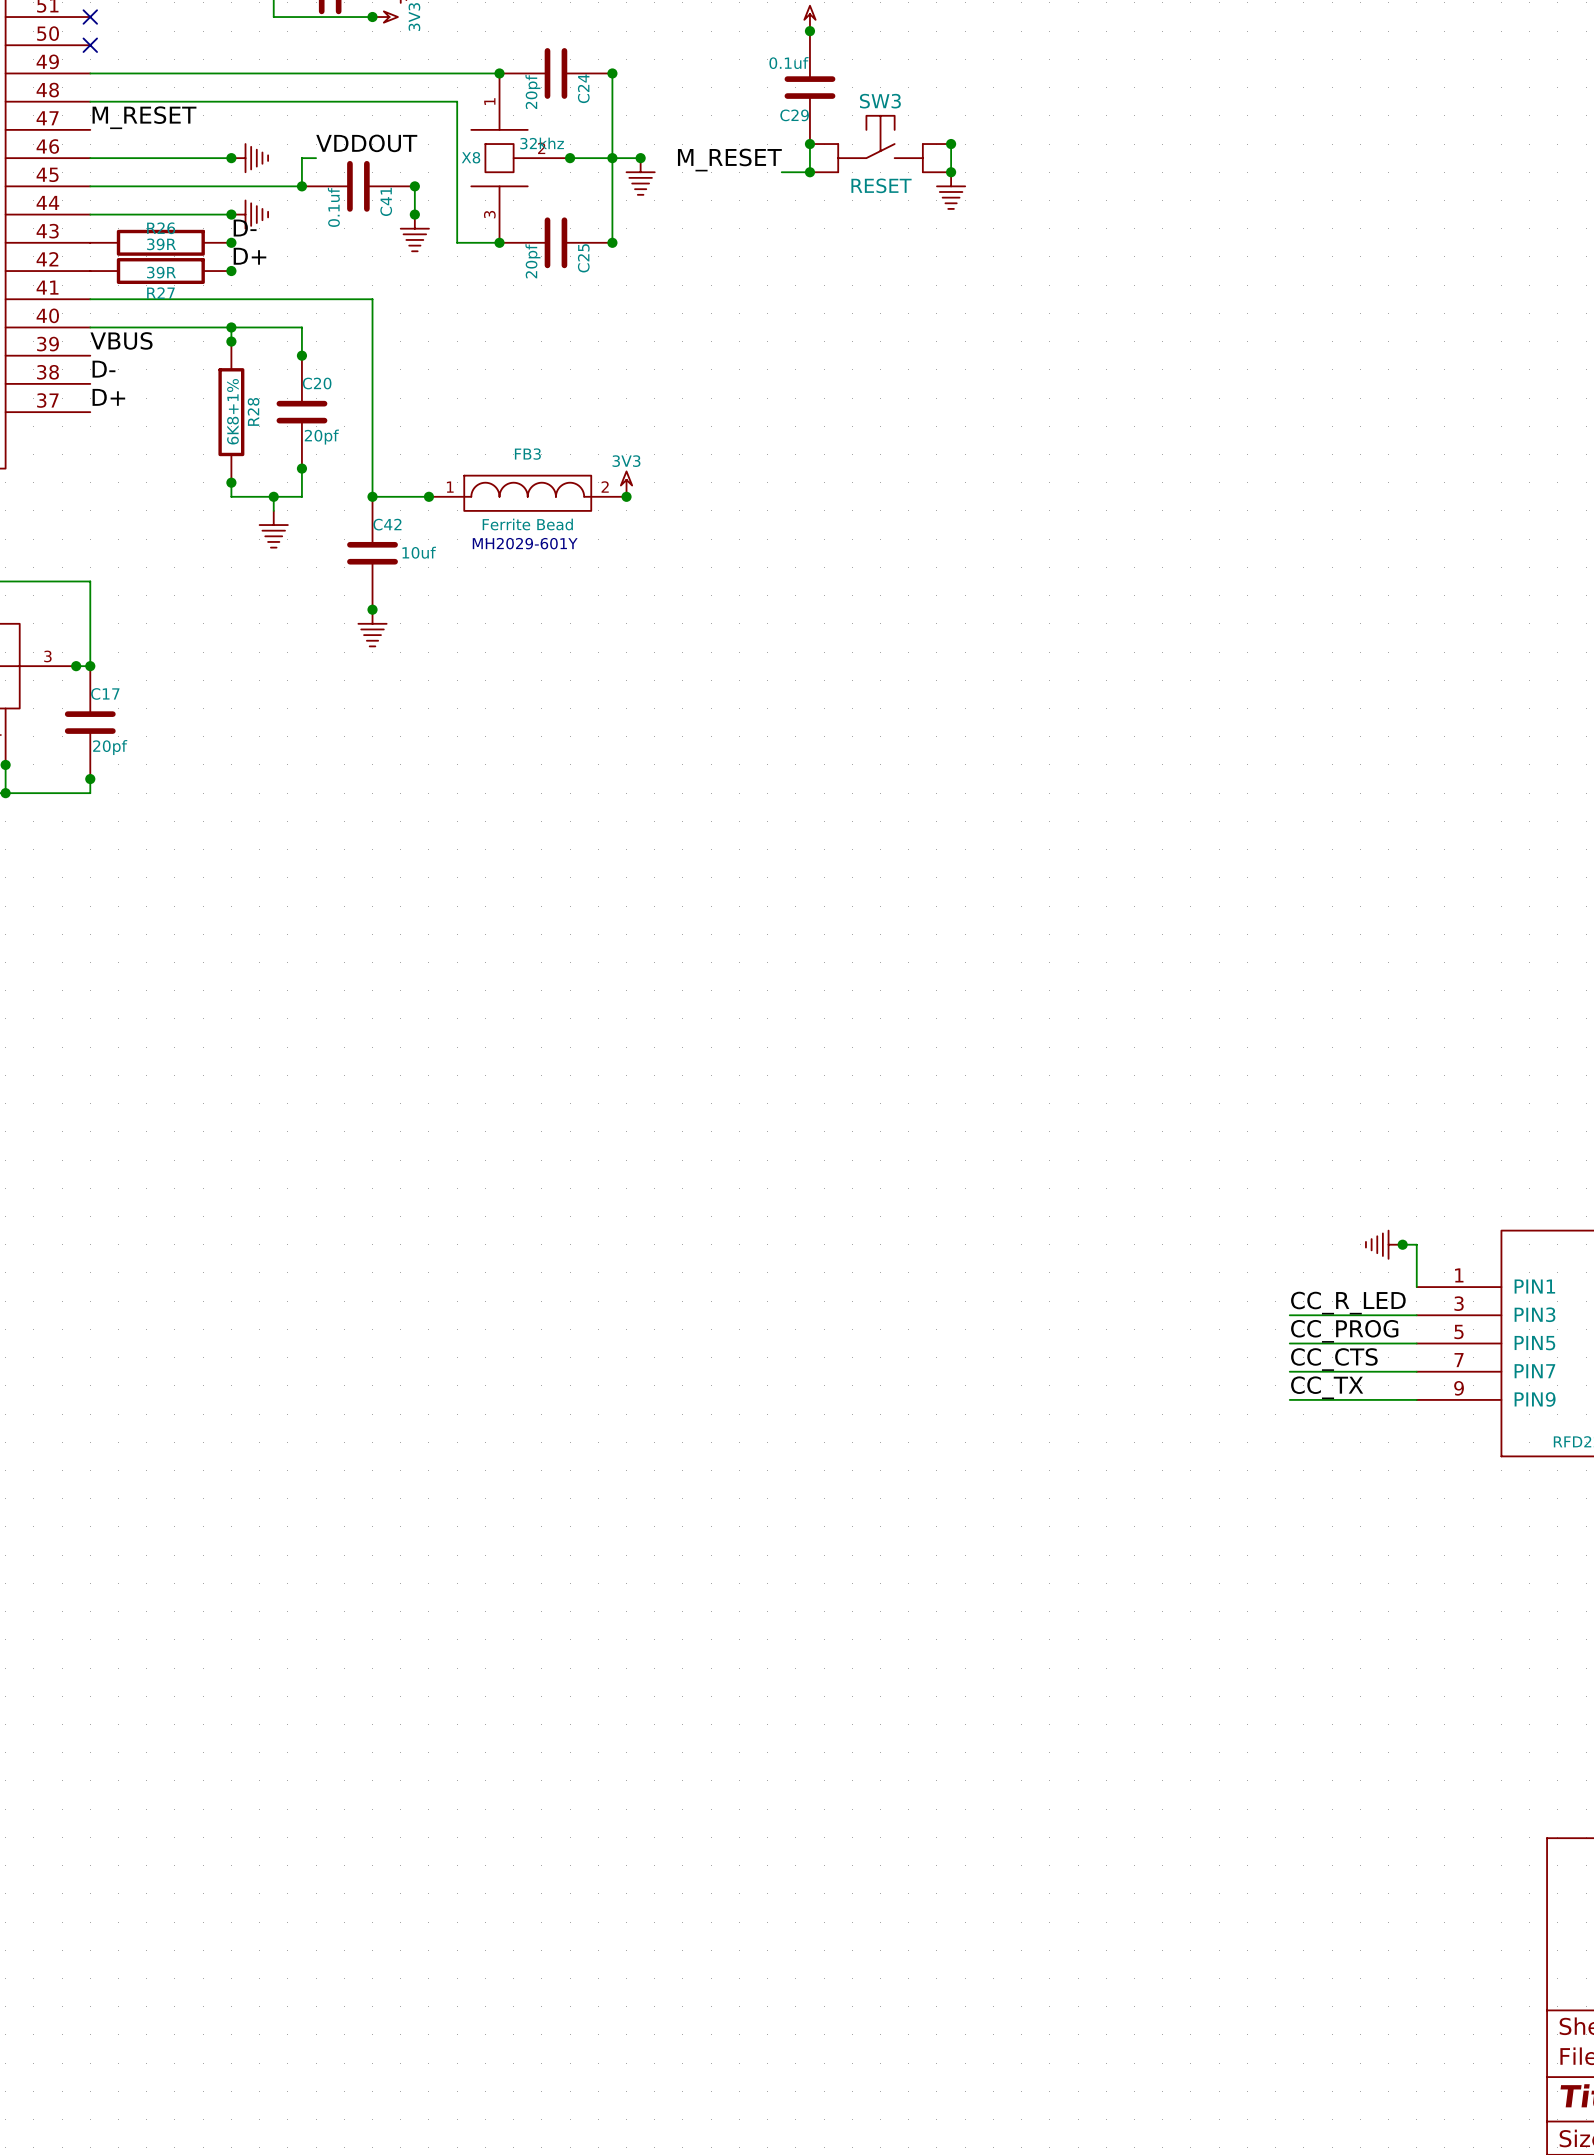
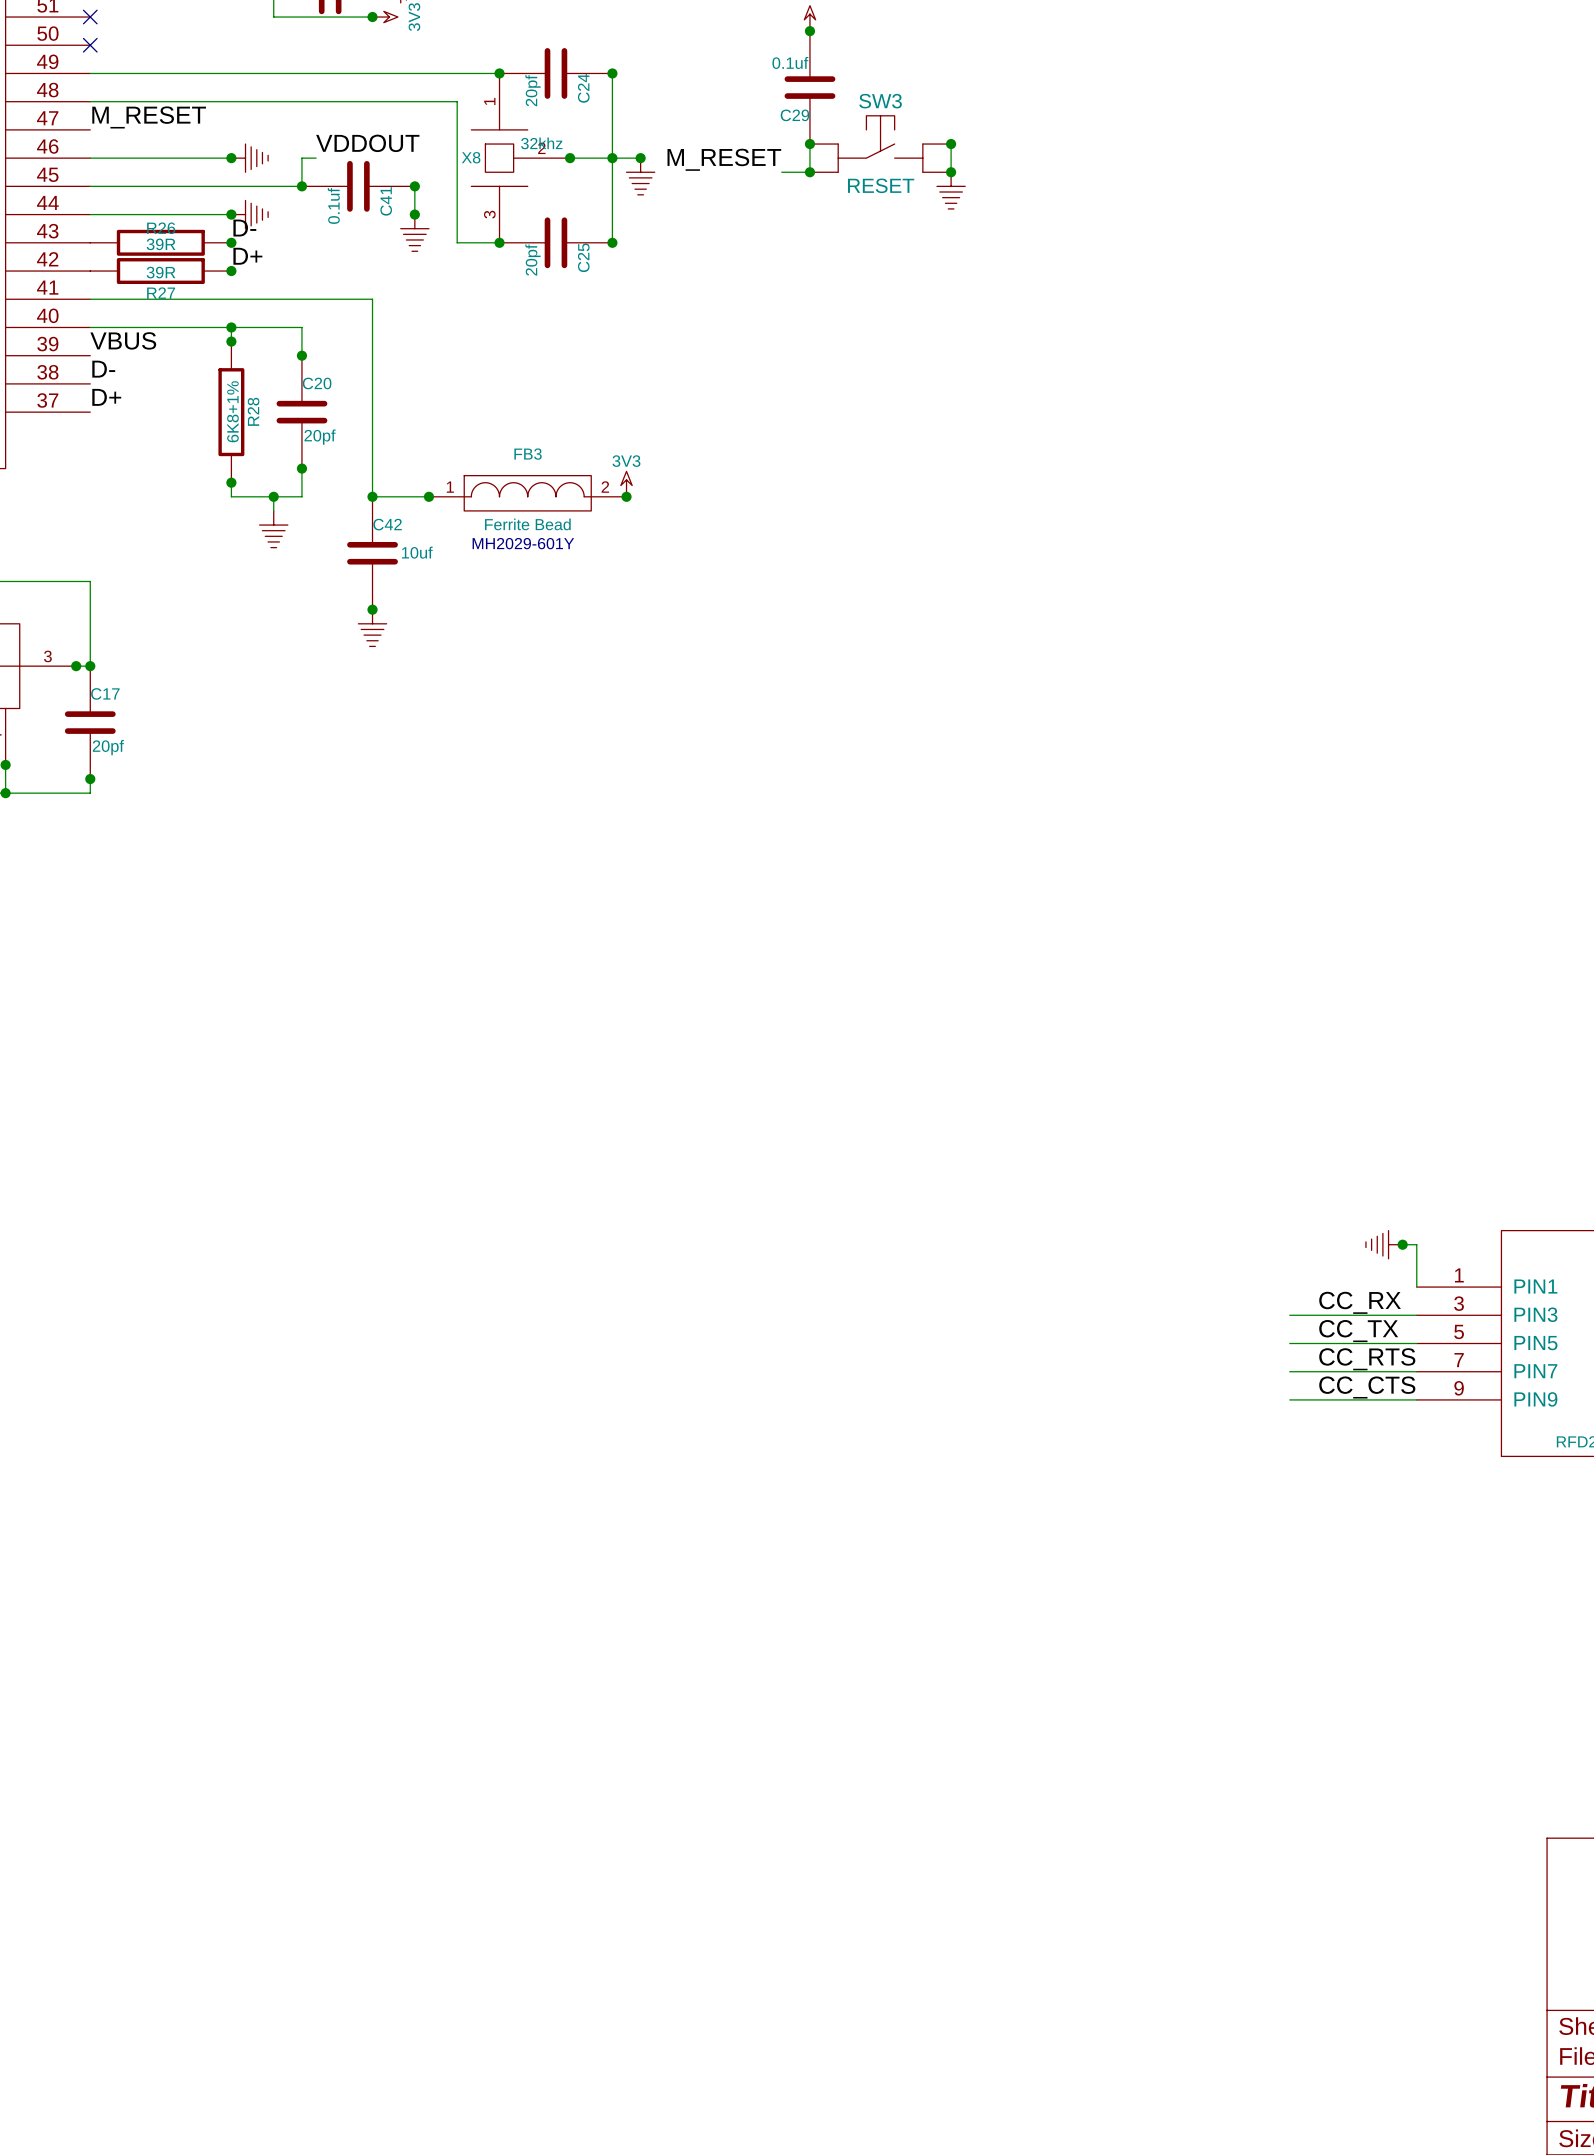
label: CC_R_LED (1348, 1303) -> none
label: none -> CC_RX (1360, 1302)
label: CC_PROG (1344, 1331) -> none
label position: CC_CTS (1334, 1359) -> CC_CTS (1367, 1387)
label: none -> CC_RTS (1367, 1359)
label position: CC_TX (1327, 1387) -> CC_TX (1358, 1331)

